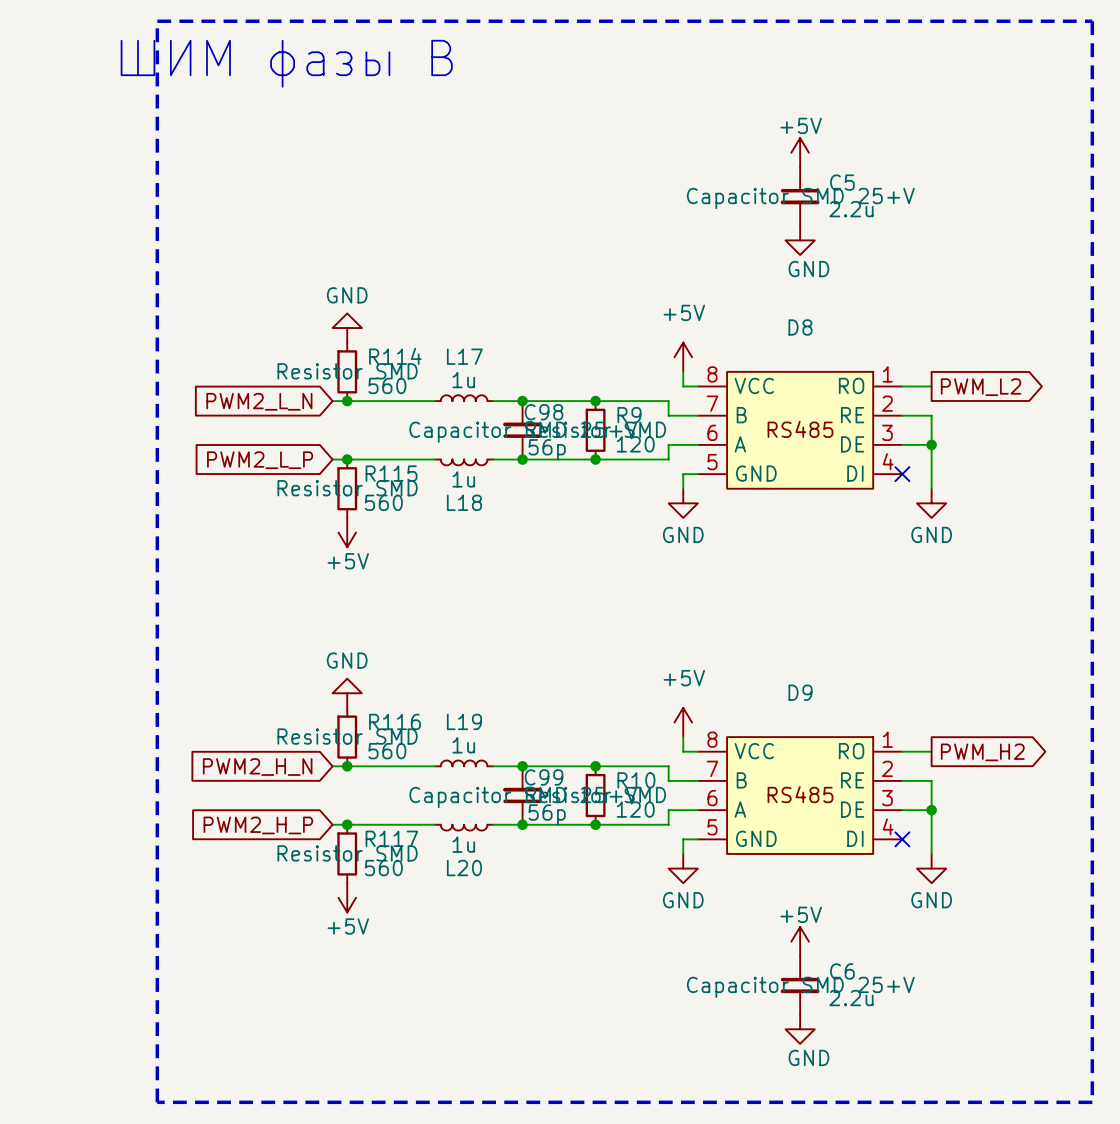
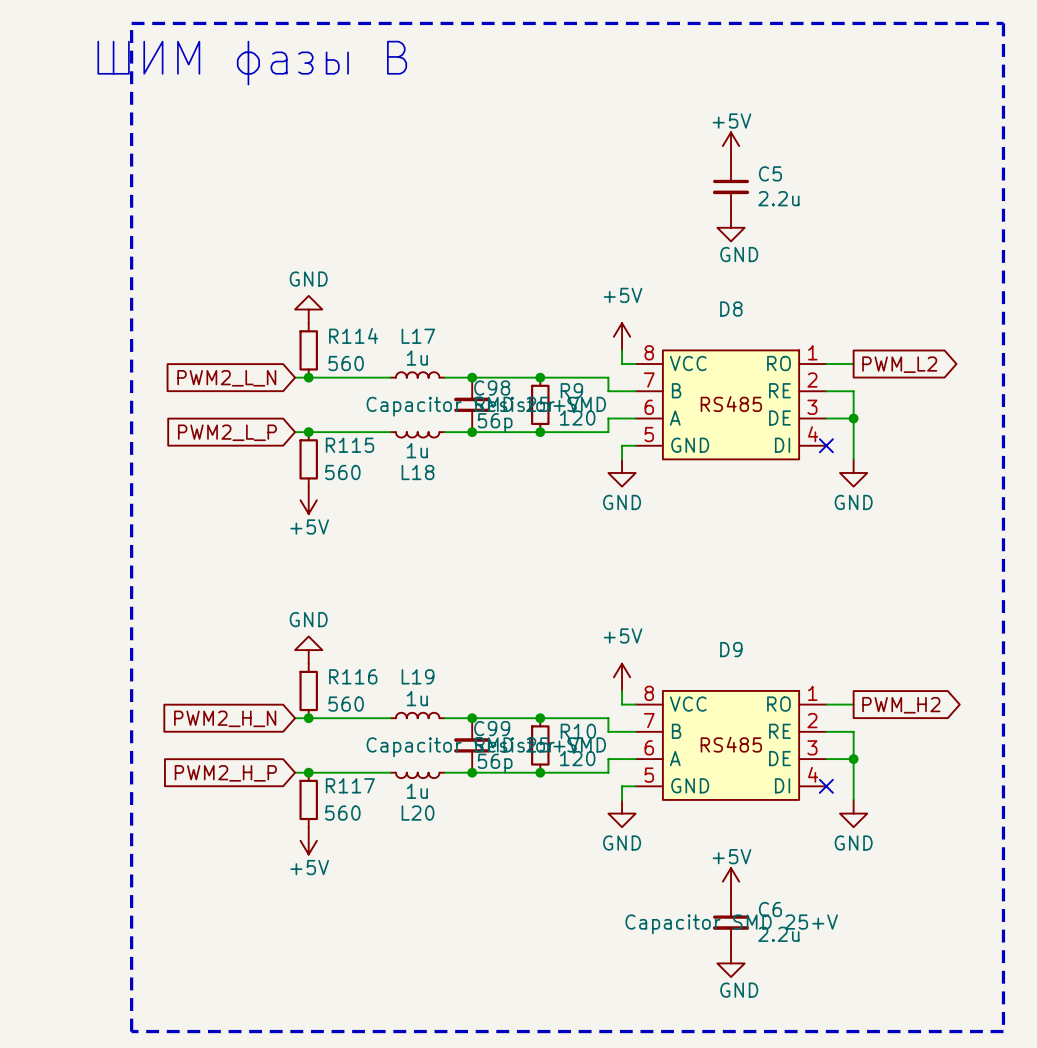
C5 text: Capacitor SMD 25+V (800, 198) -> none
R114 text: Resistor SMD (347, 371) -> none
R115 text: Resistor SMD (347, 488) -> none
R116 text: Resistor SMD (347, 736) -> none
R117 text: Resistor SMD (347, 853) -> none

